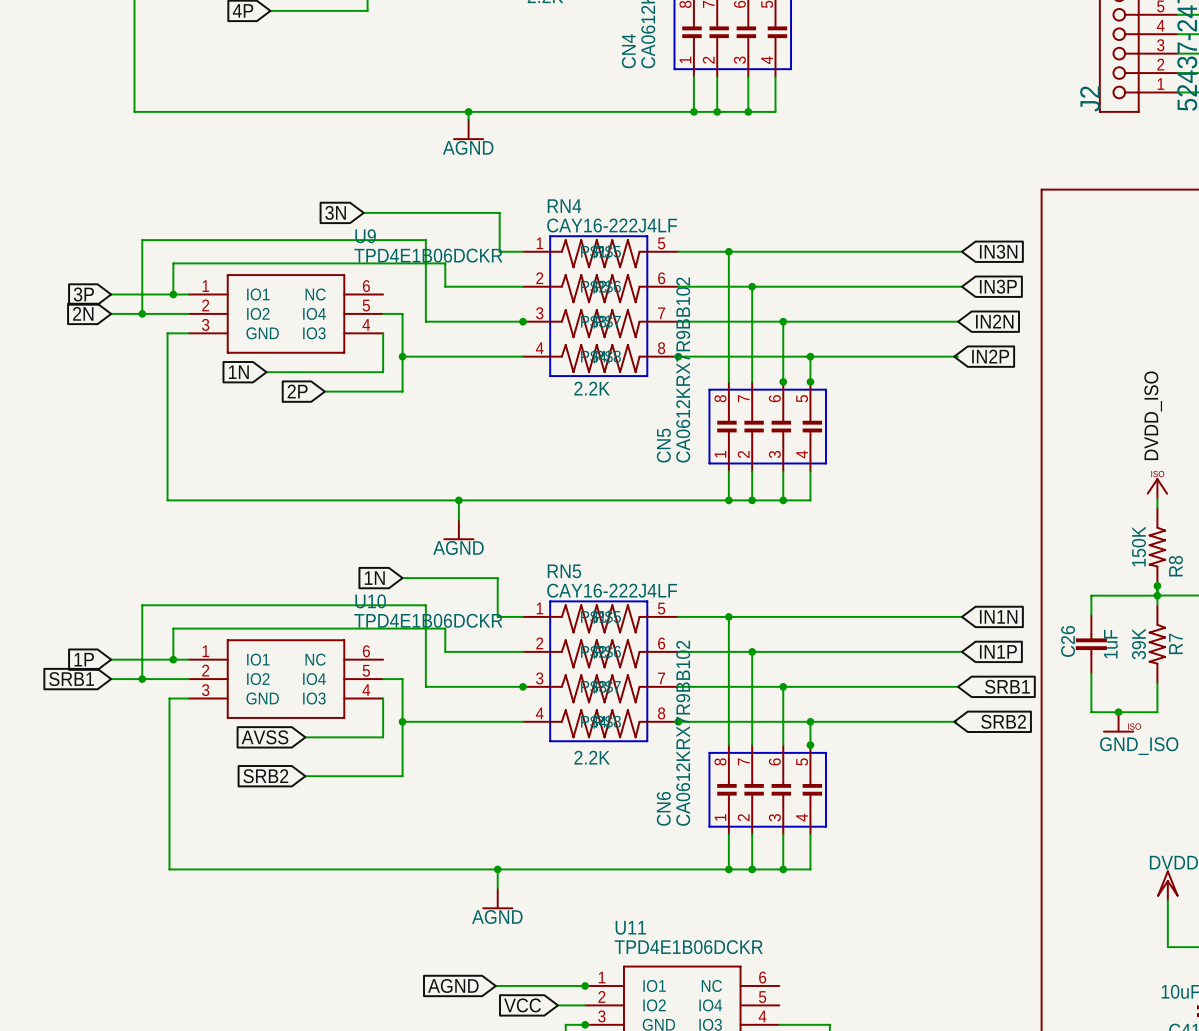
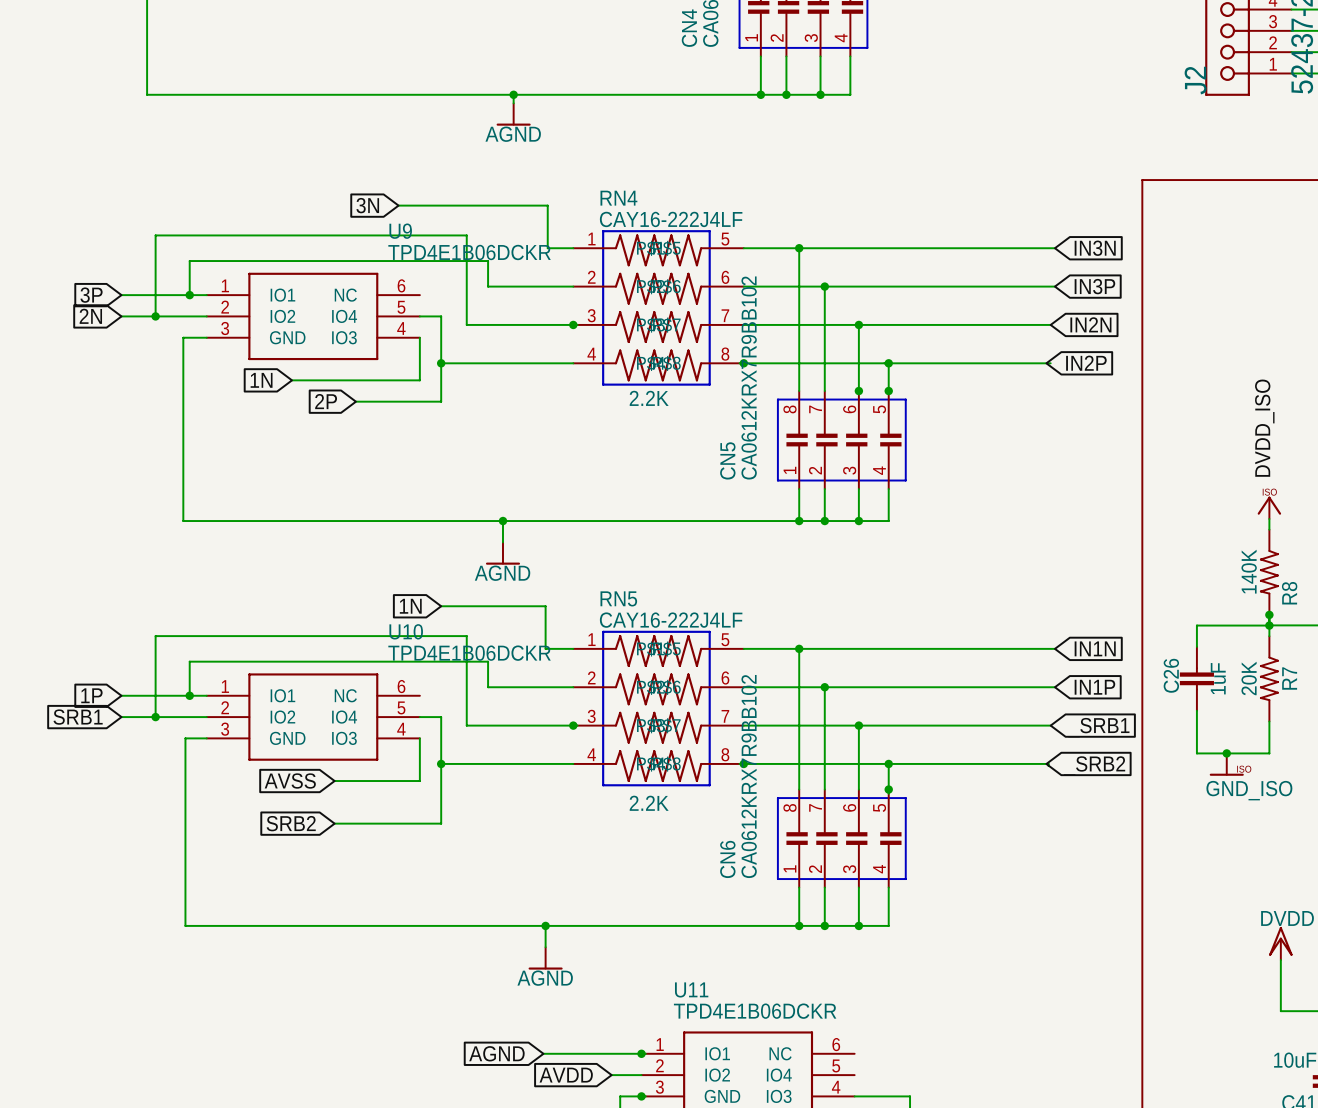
R8 value: 150K (1138, 546) -> 140K (1249, 571)
R7 value: 39K (1138, 643) -> 20K (1249, 678)
global label: VCC (522, 1005) -> AVDD (566, 1075)

